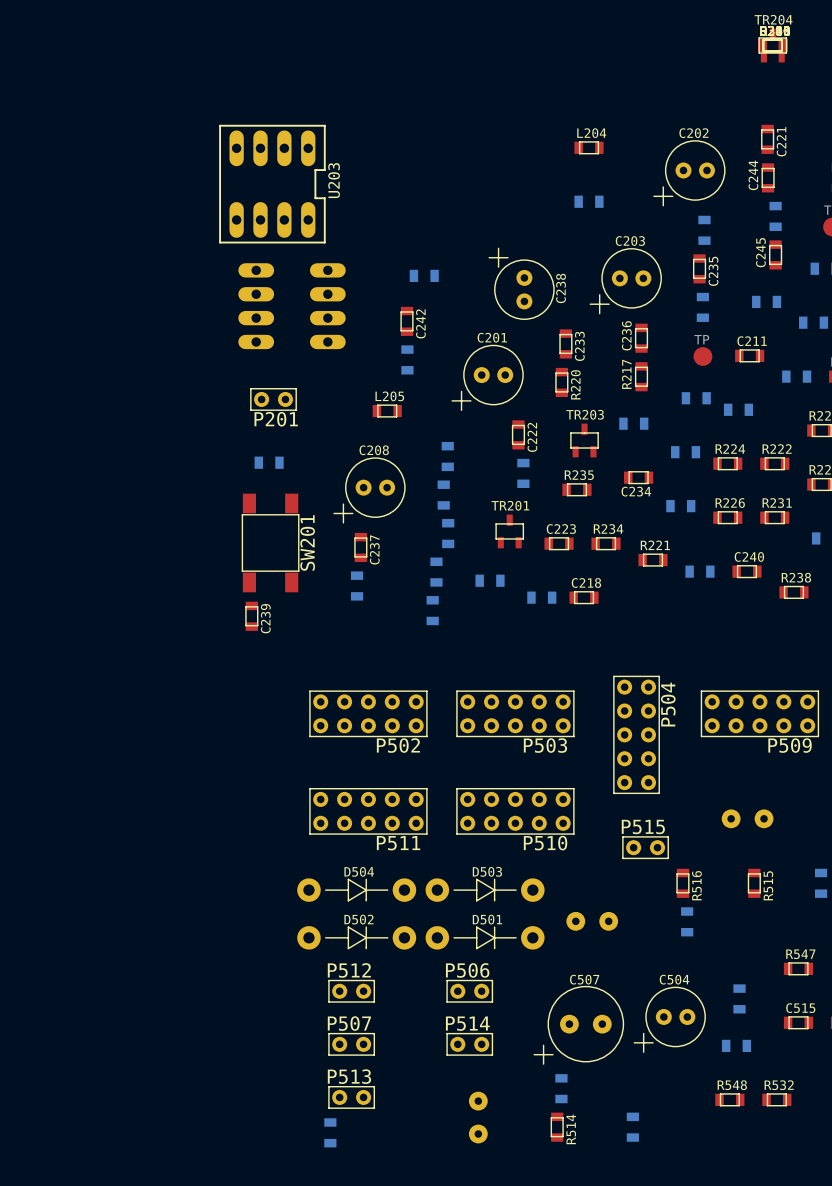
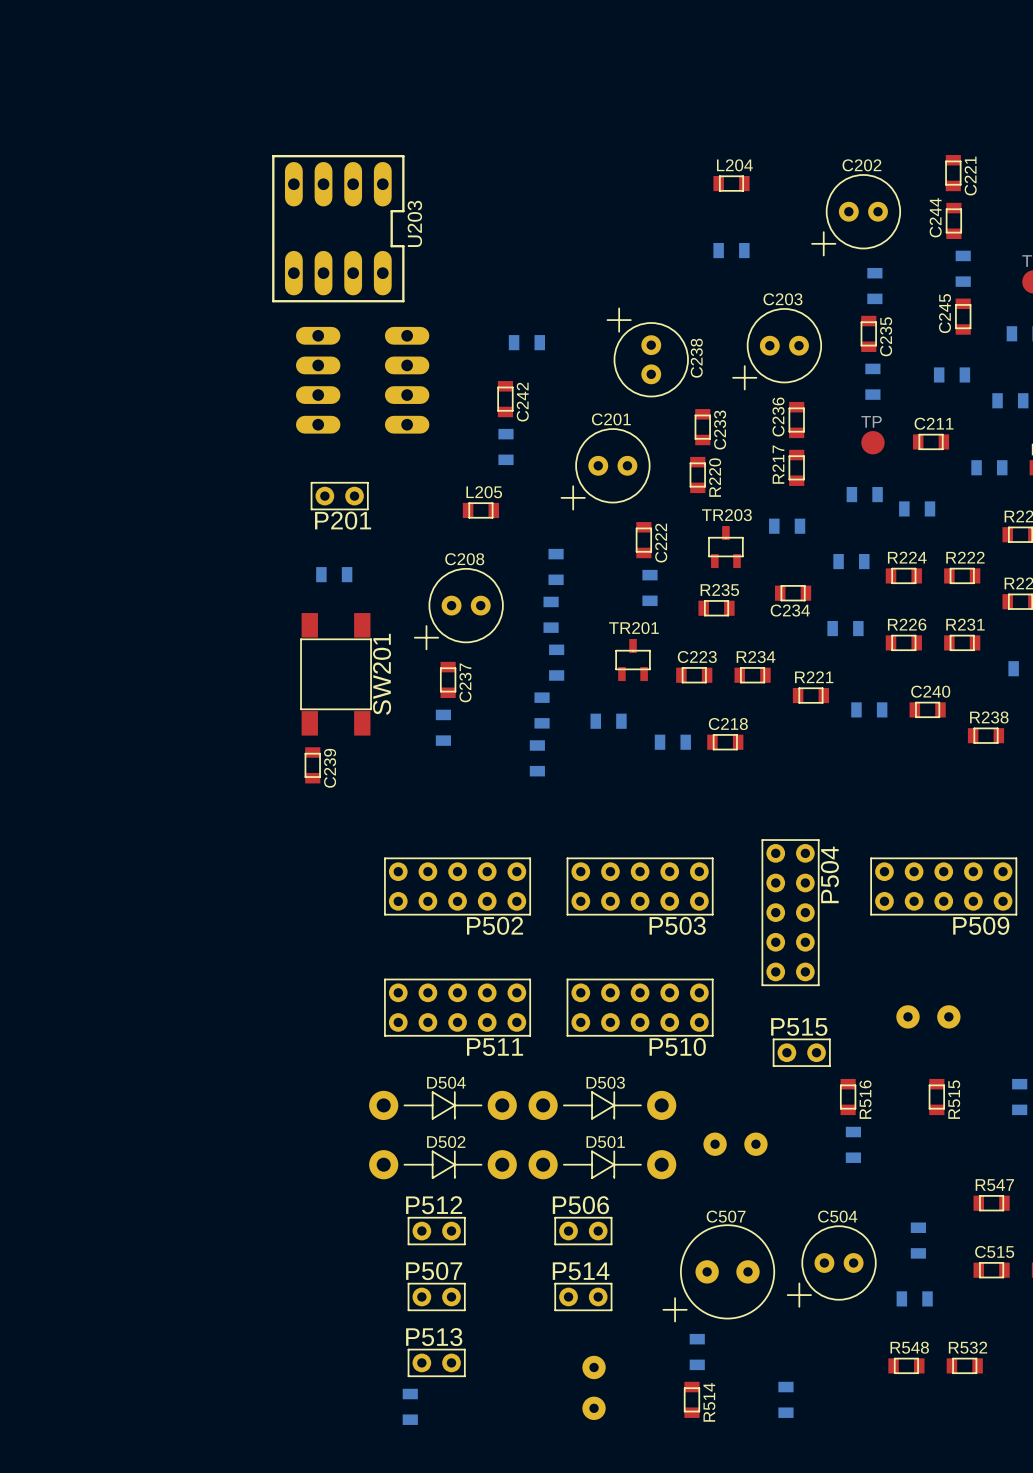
part: (772, 45) -> none
part: (772, 45) -> none
part: (772, 45) -> none
part: (772, 45) -> none
part: (772, 45) -> none
part: (772, 45) -> none
TR204: (772, 45) -> none

